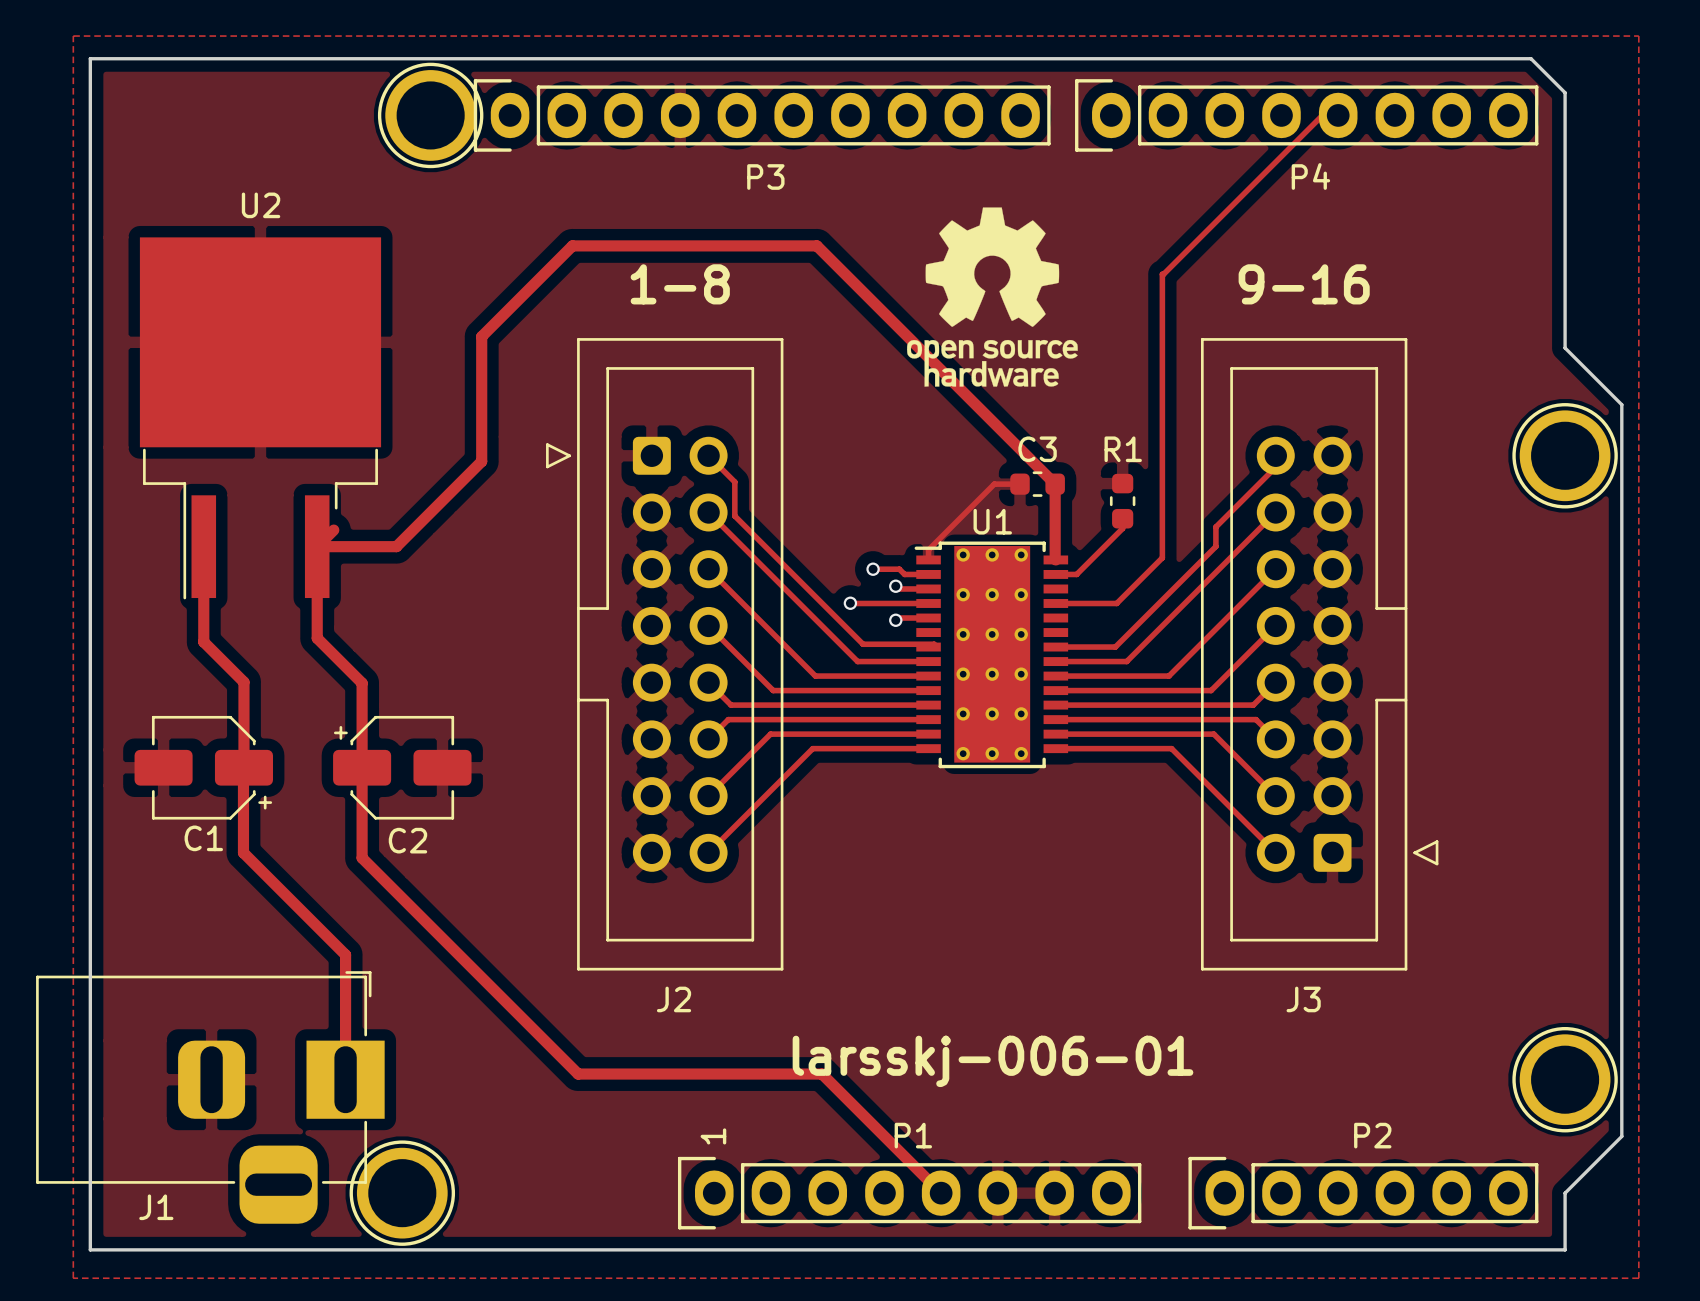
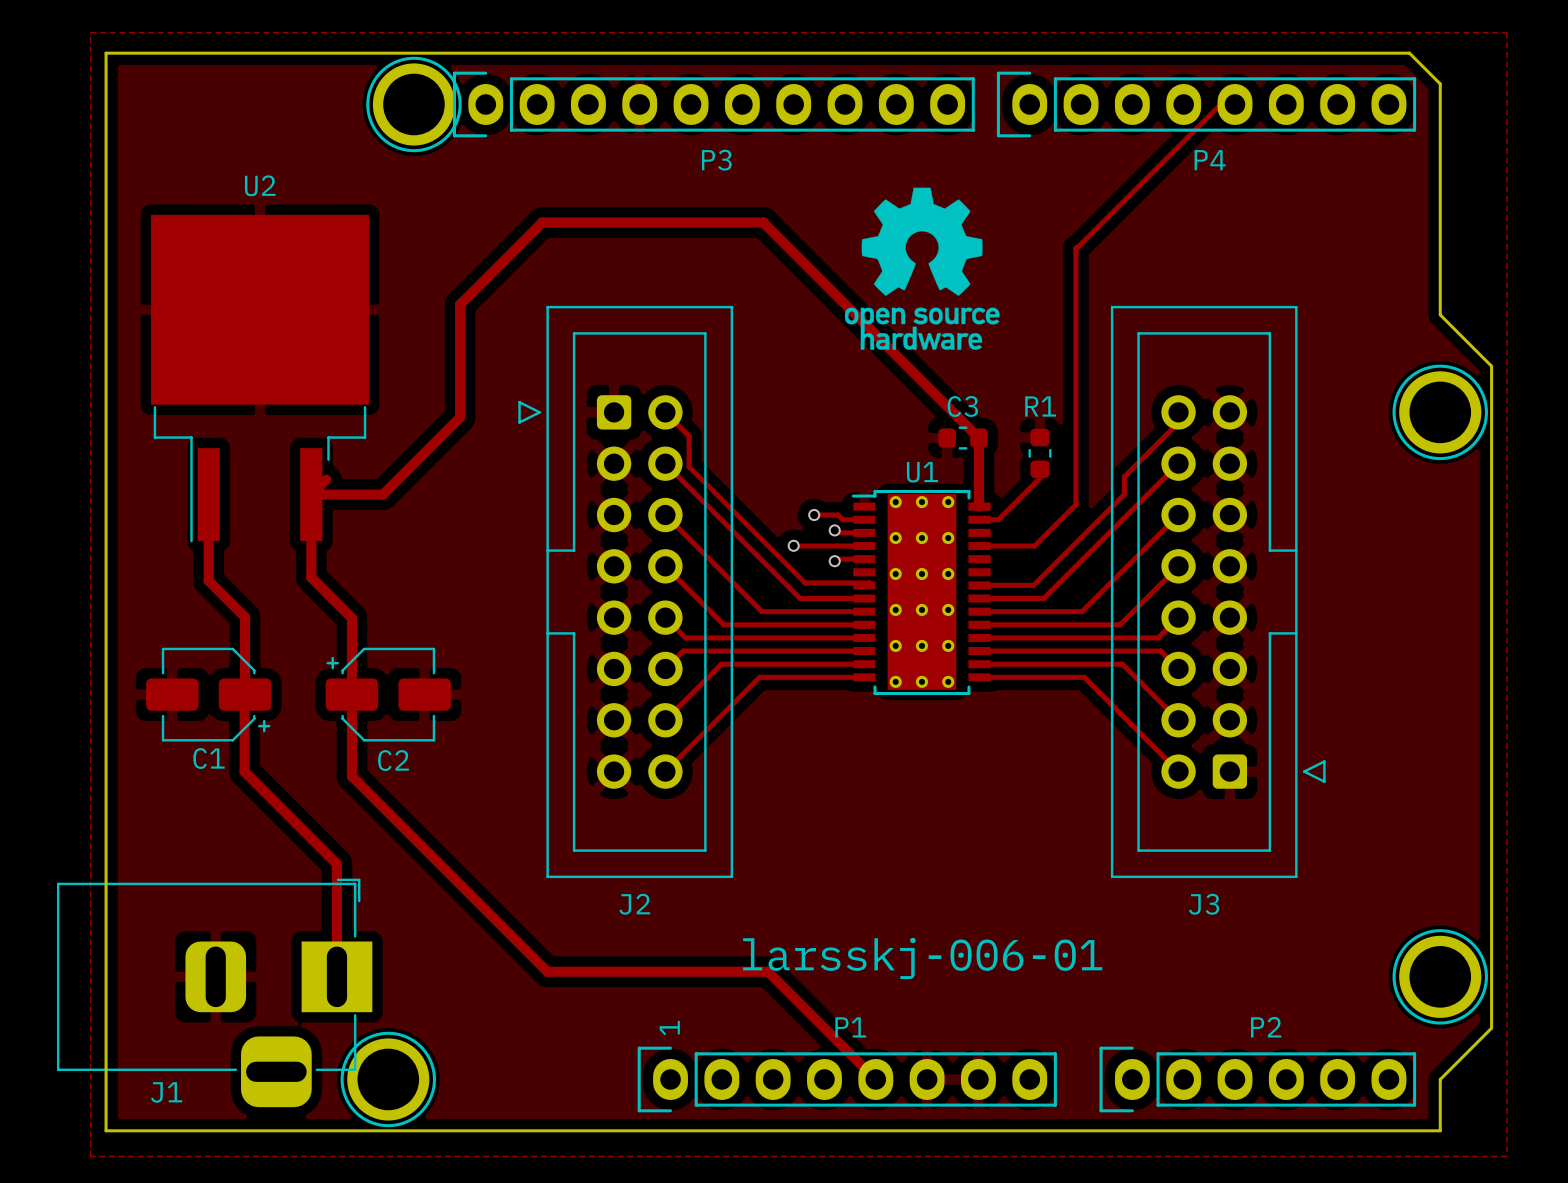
text: 1-8 (680, 284) -> none
text: 9-16 (1304, 284) -> none
track: (1019, 484) (994, 484) (928, 549) (928, 559) -> none

